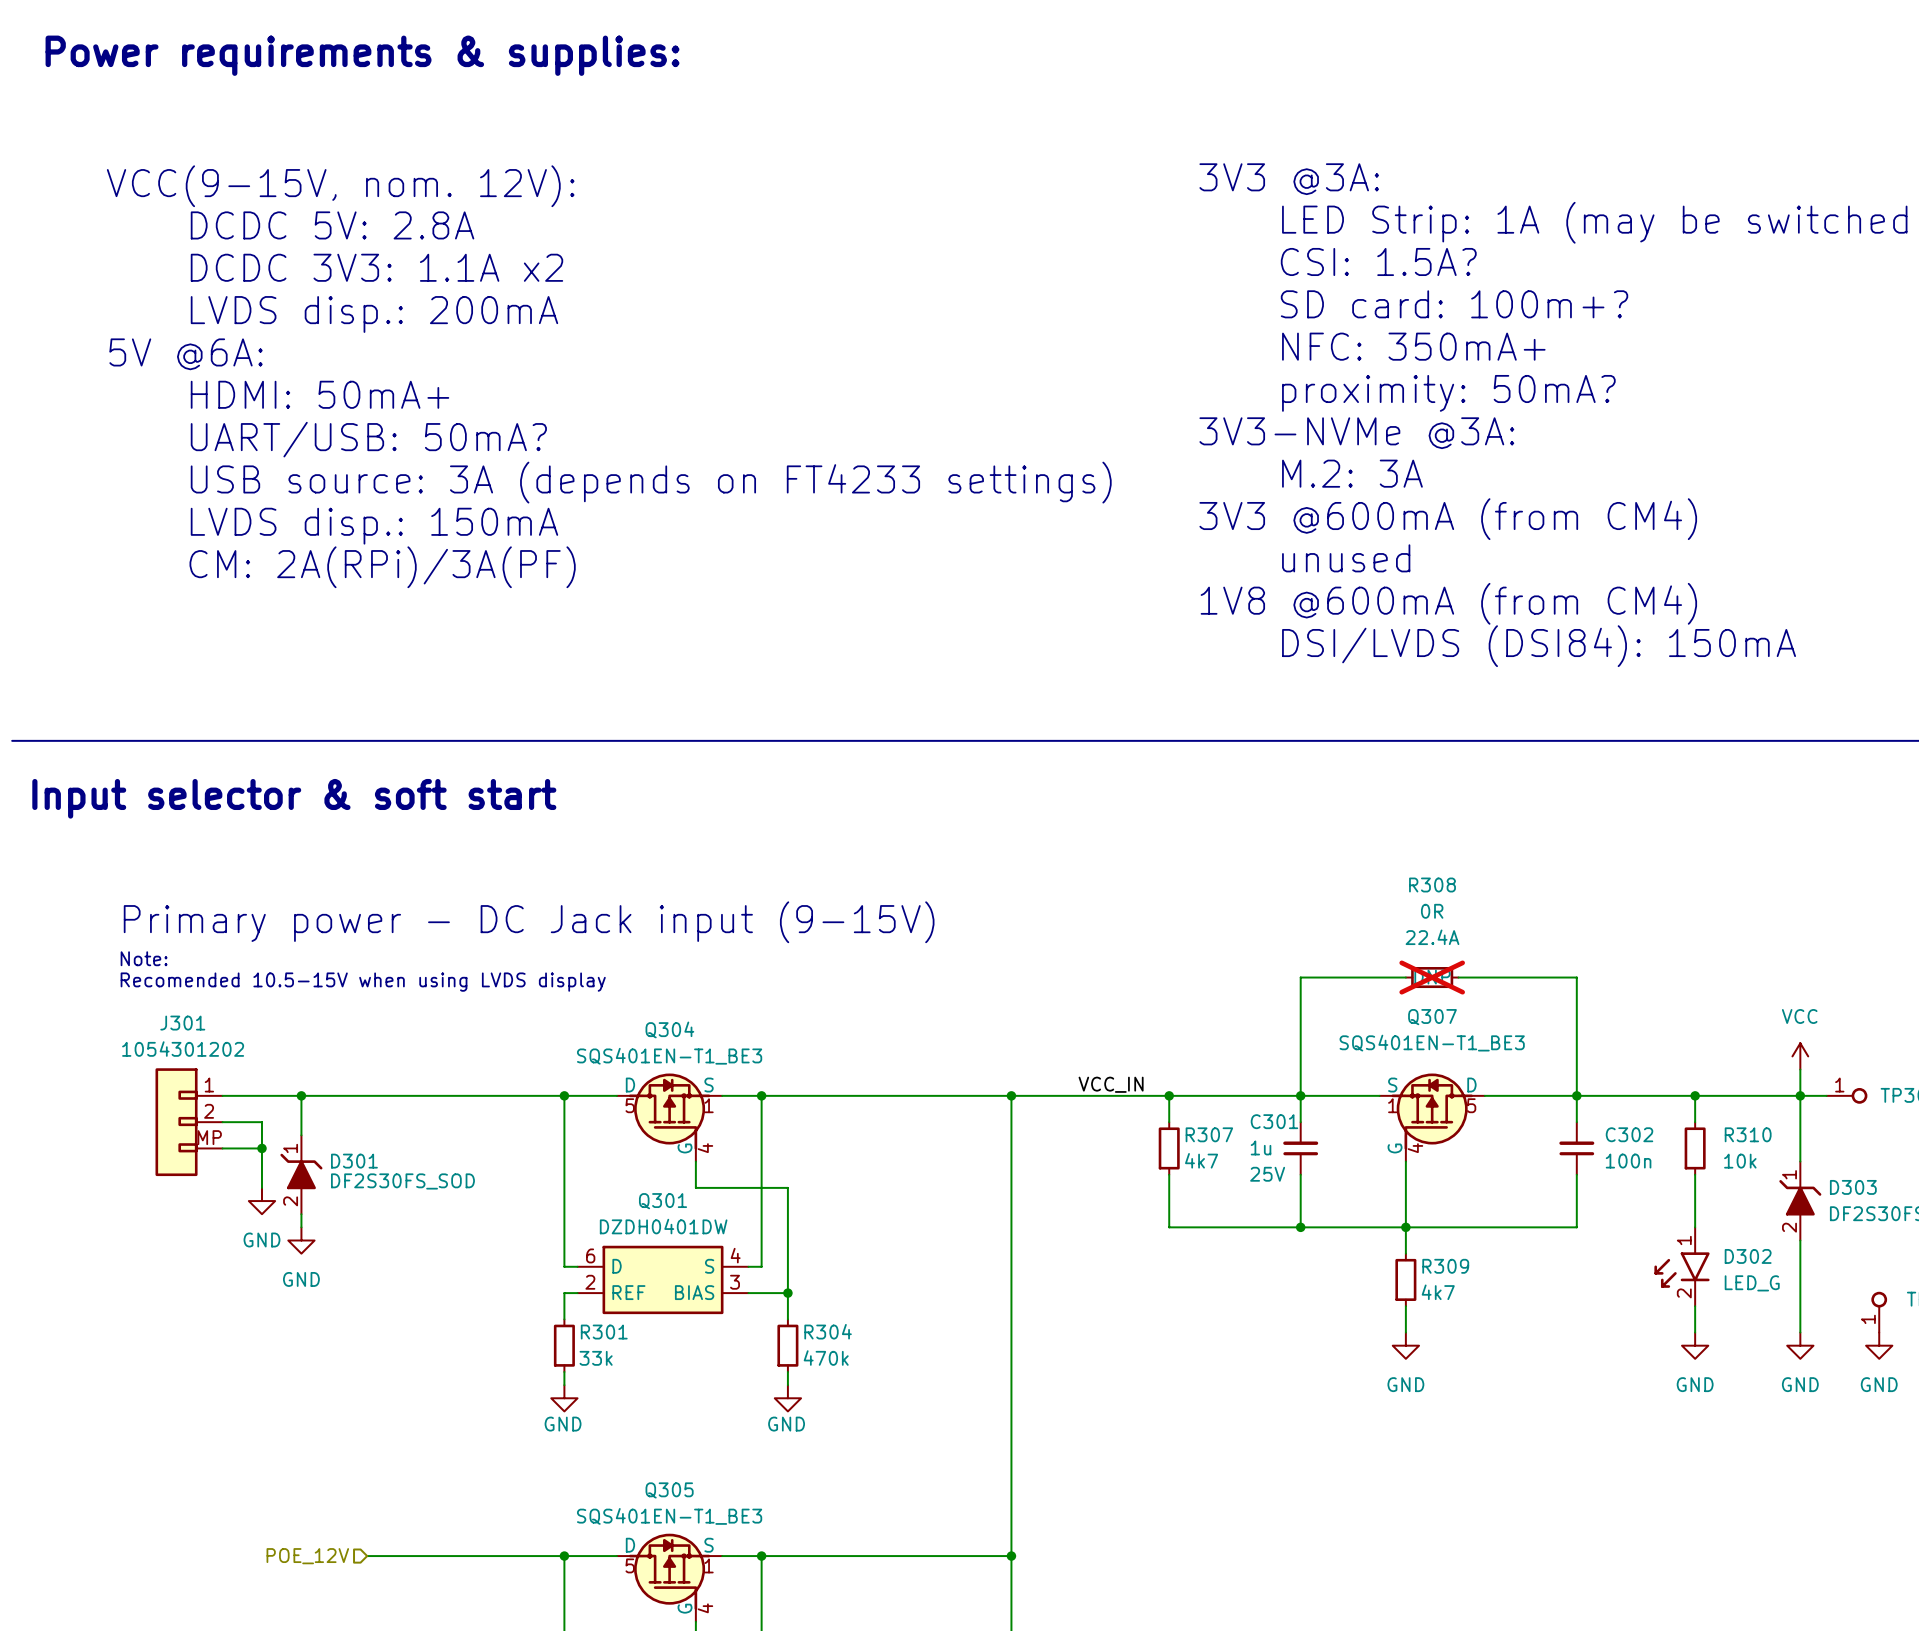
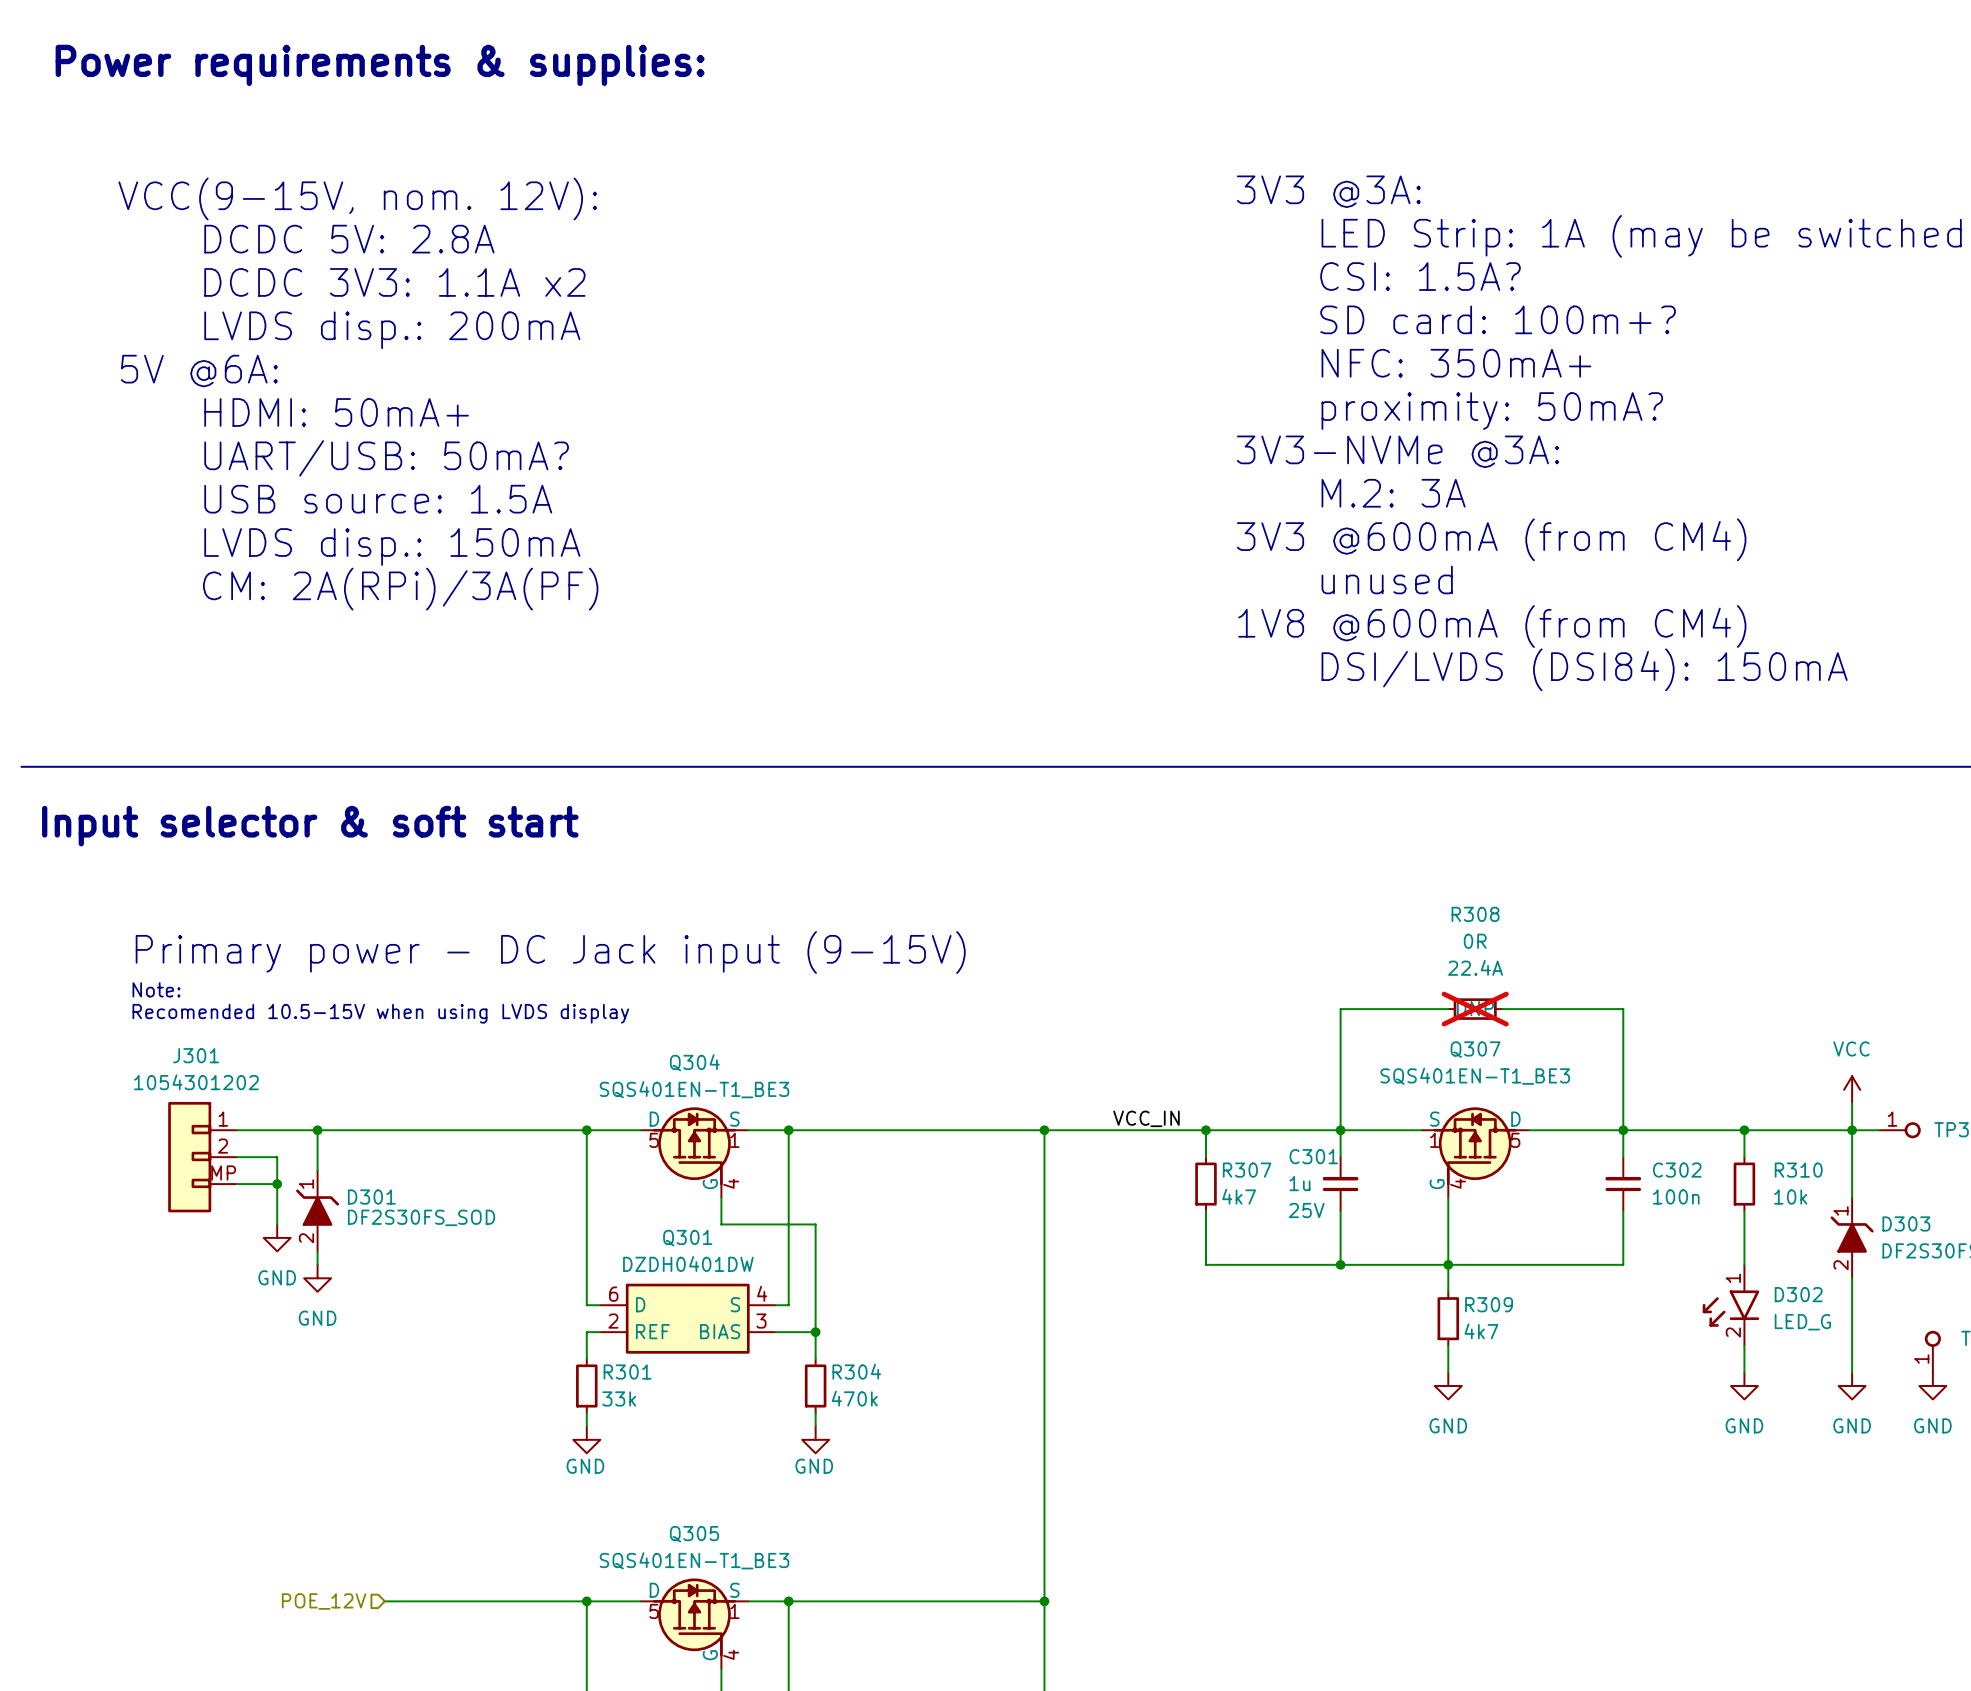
text: USB source: 3A (depends on FT4233 settings) (651, 482) -> USB source: 1.5A (378, 499)

